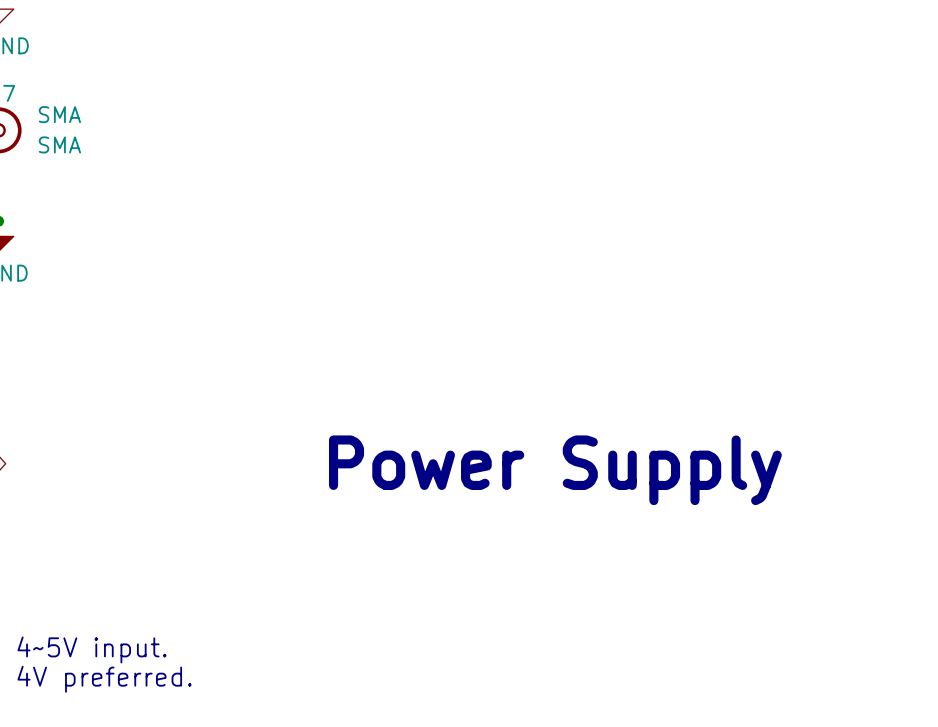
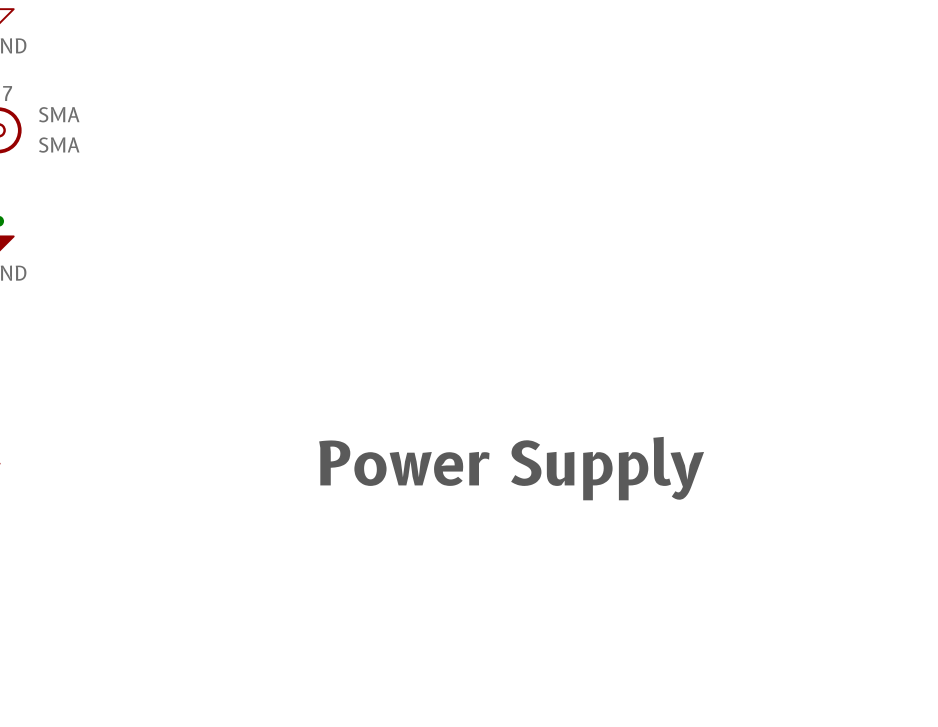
text: 4~5V input. (91, 649) -> none
text: 4V preferred. (104, 679) -> none

